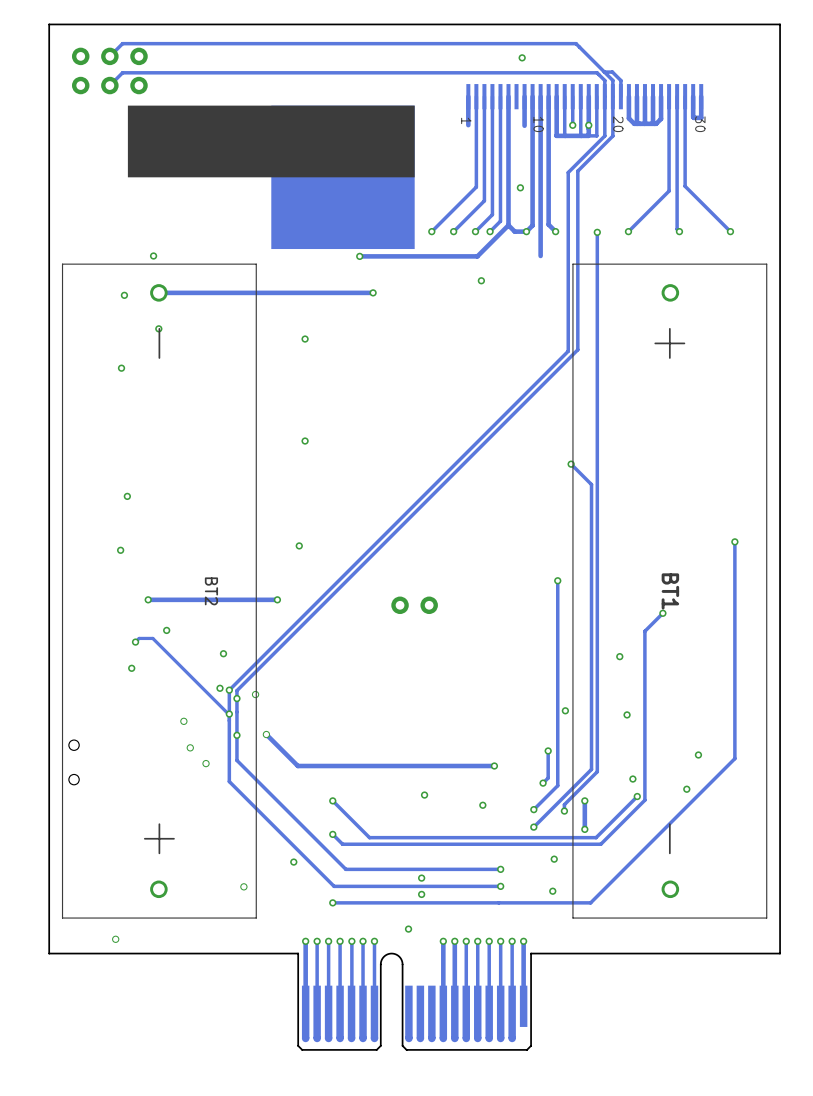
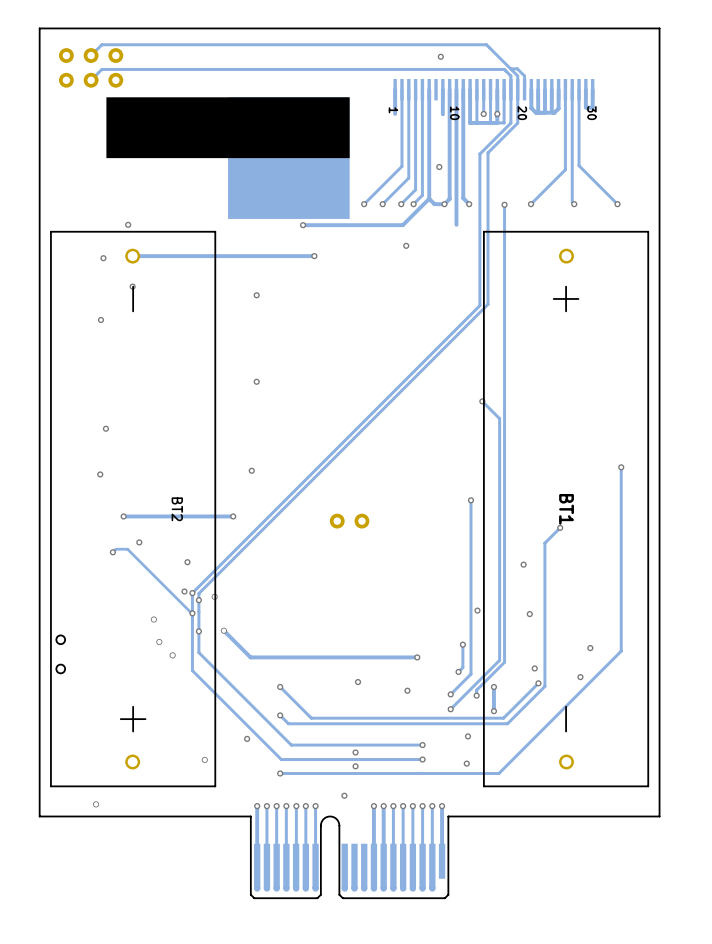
via: (131, 668) -> none

